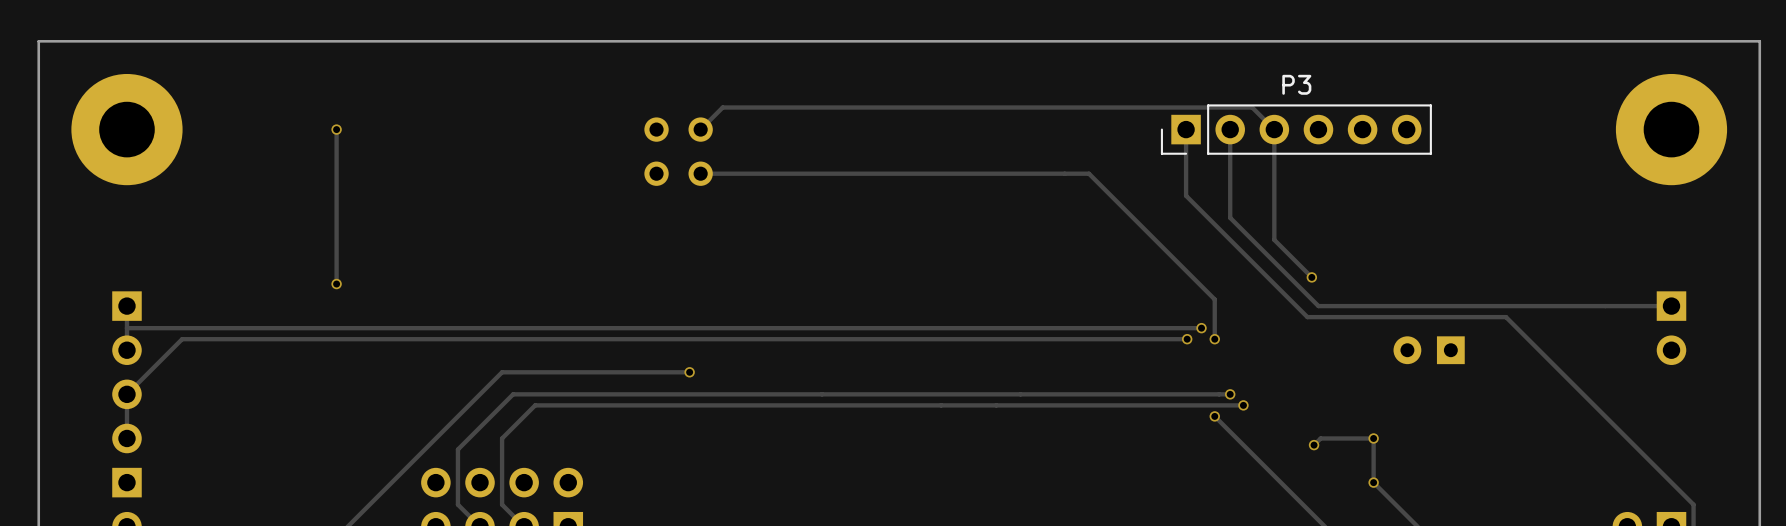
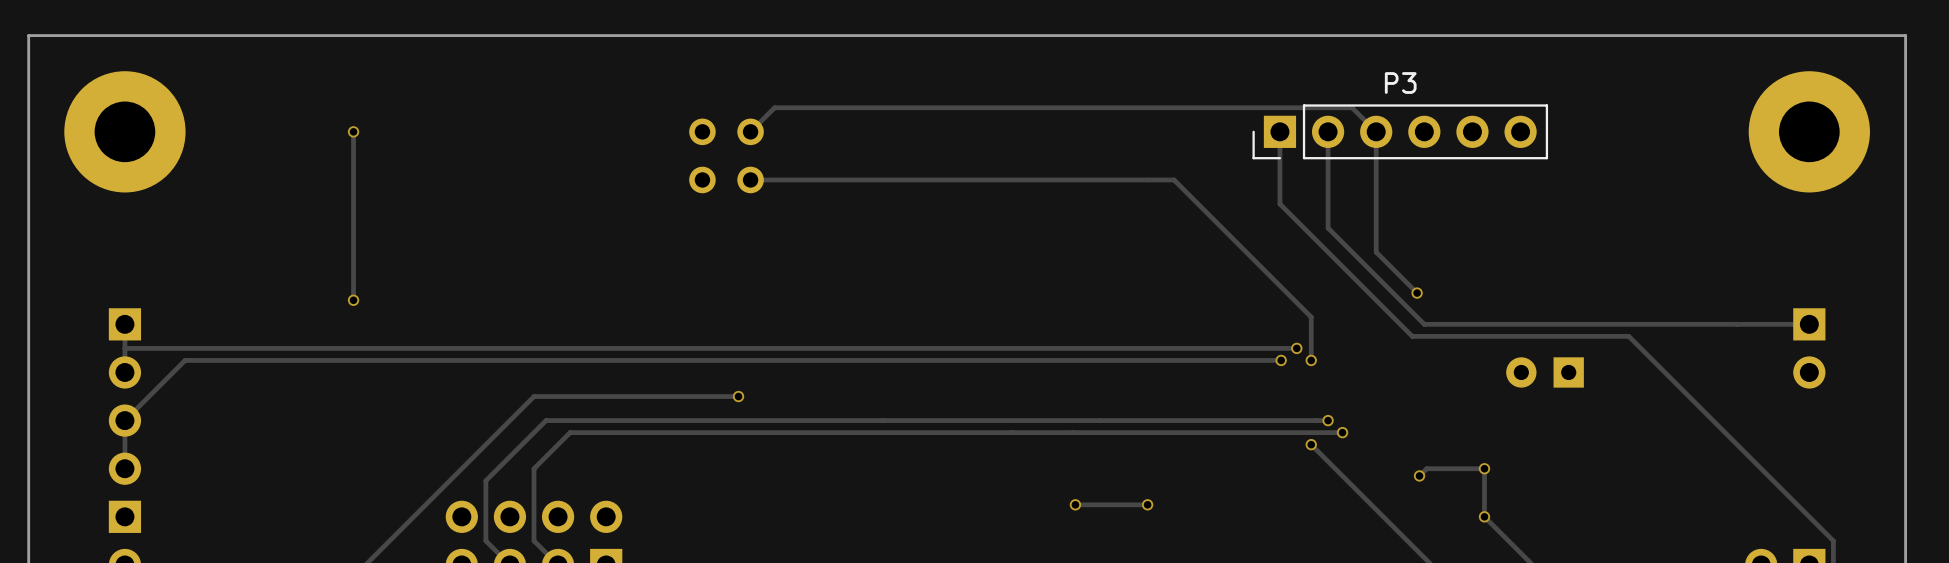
via: none -> (1075, 504)
track: none -> (1147, 504) (1075, 504)
via: none -> (1147, 504)

